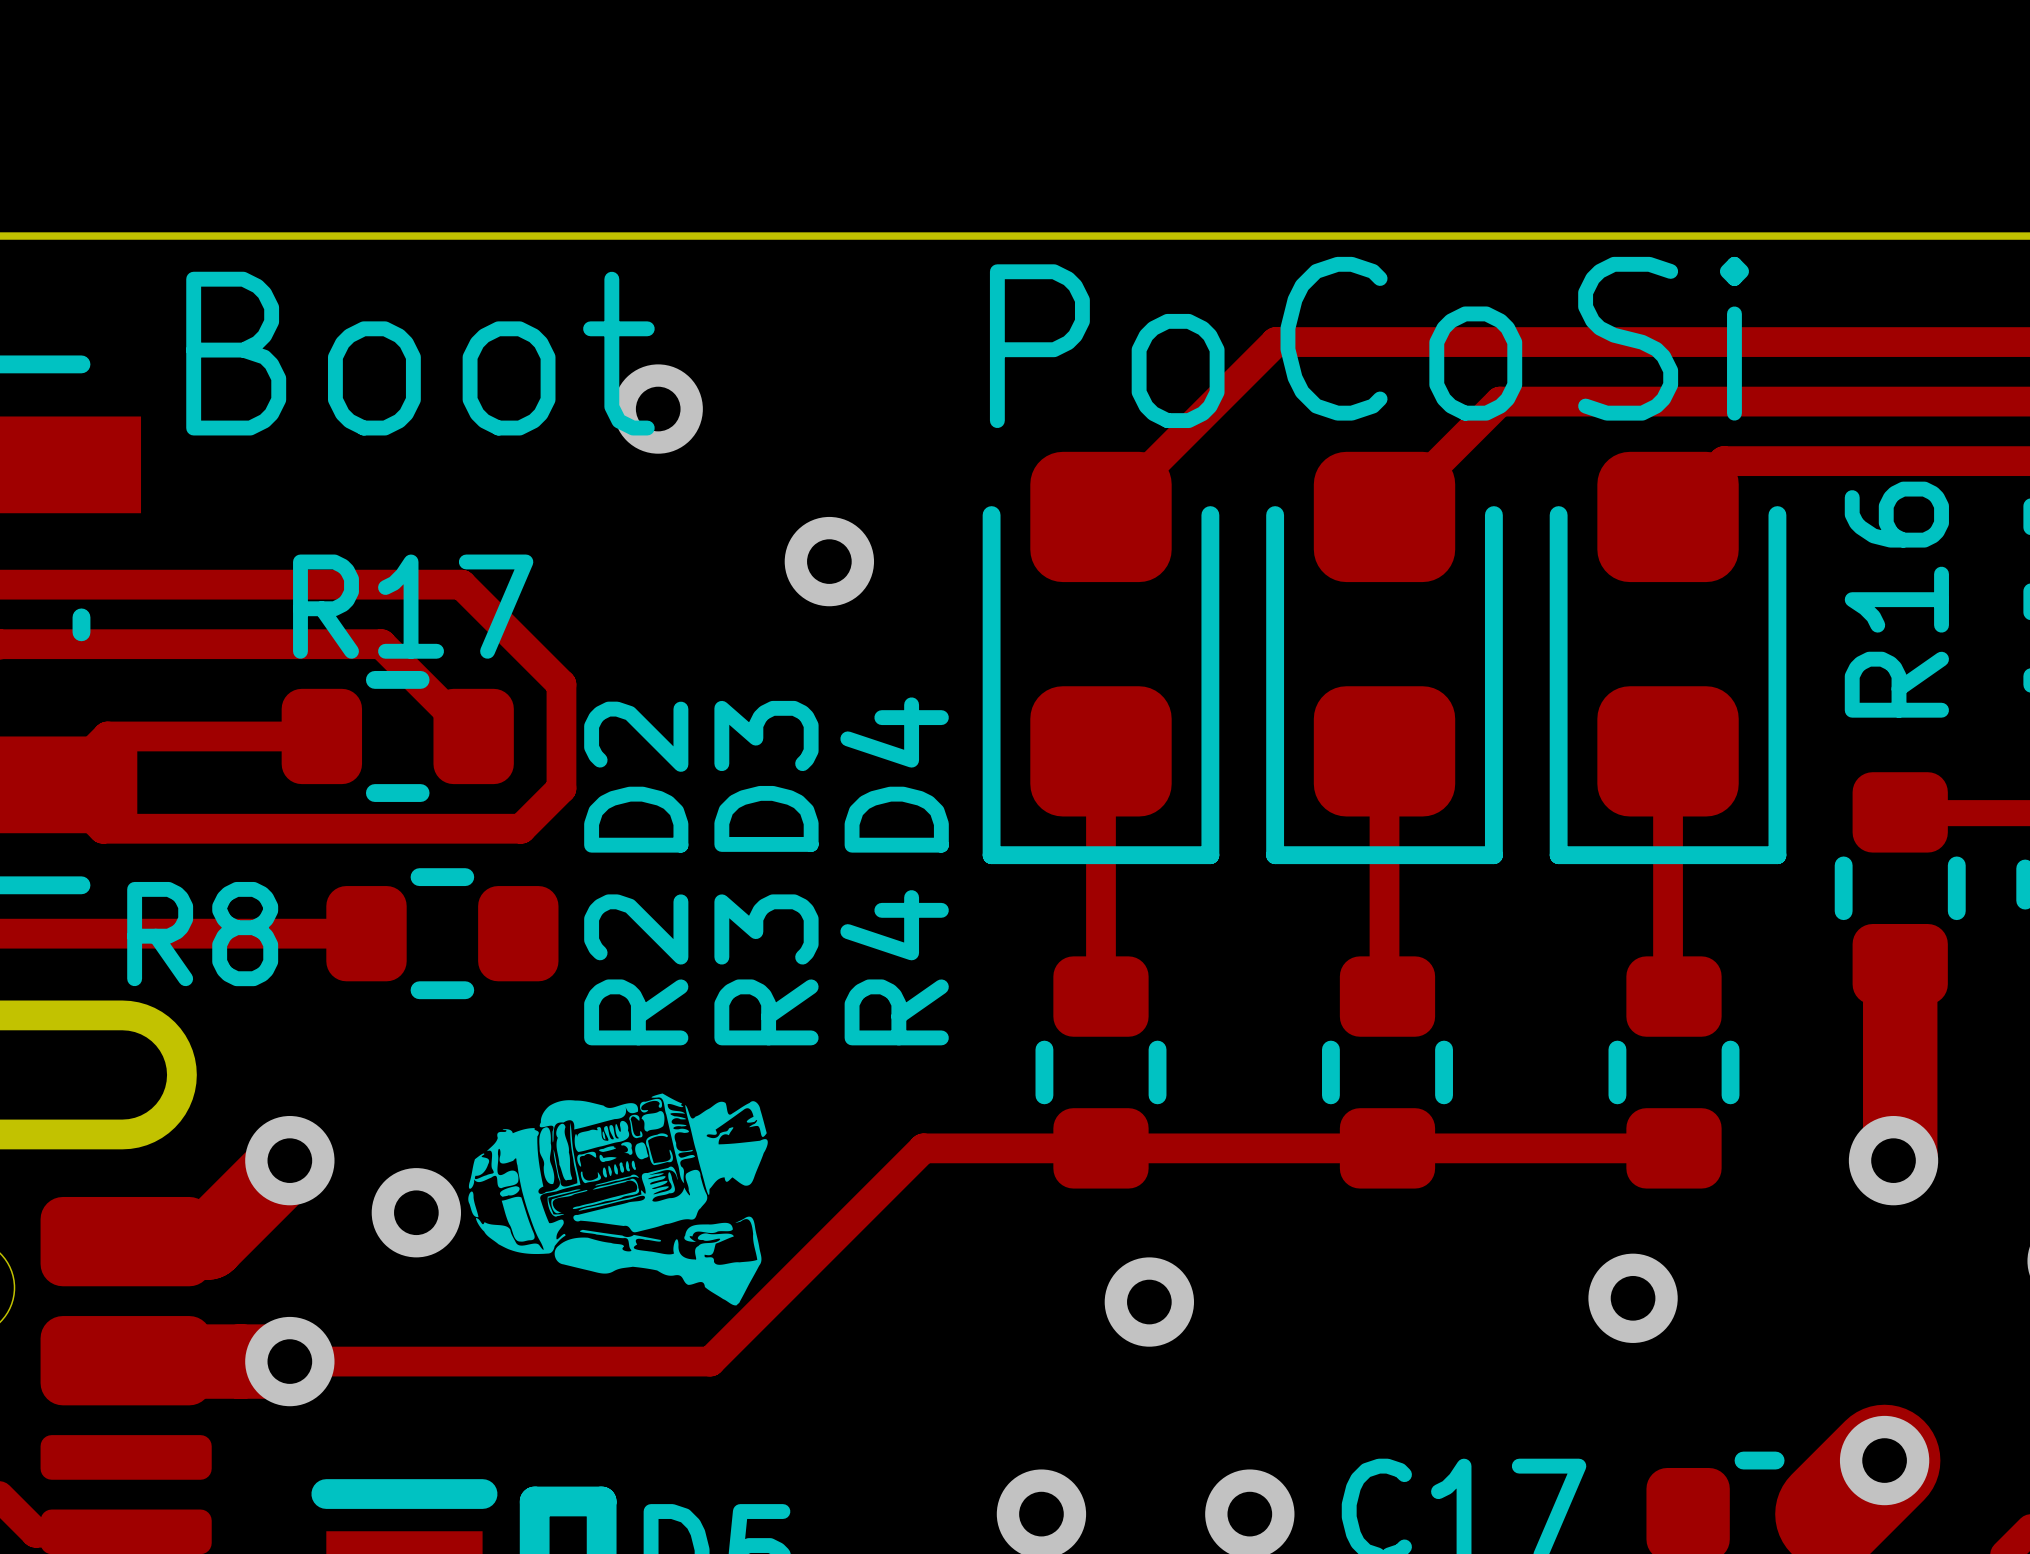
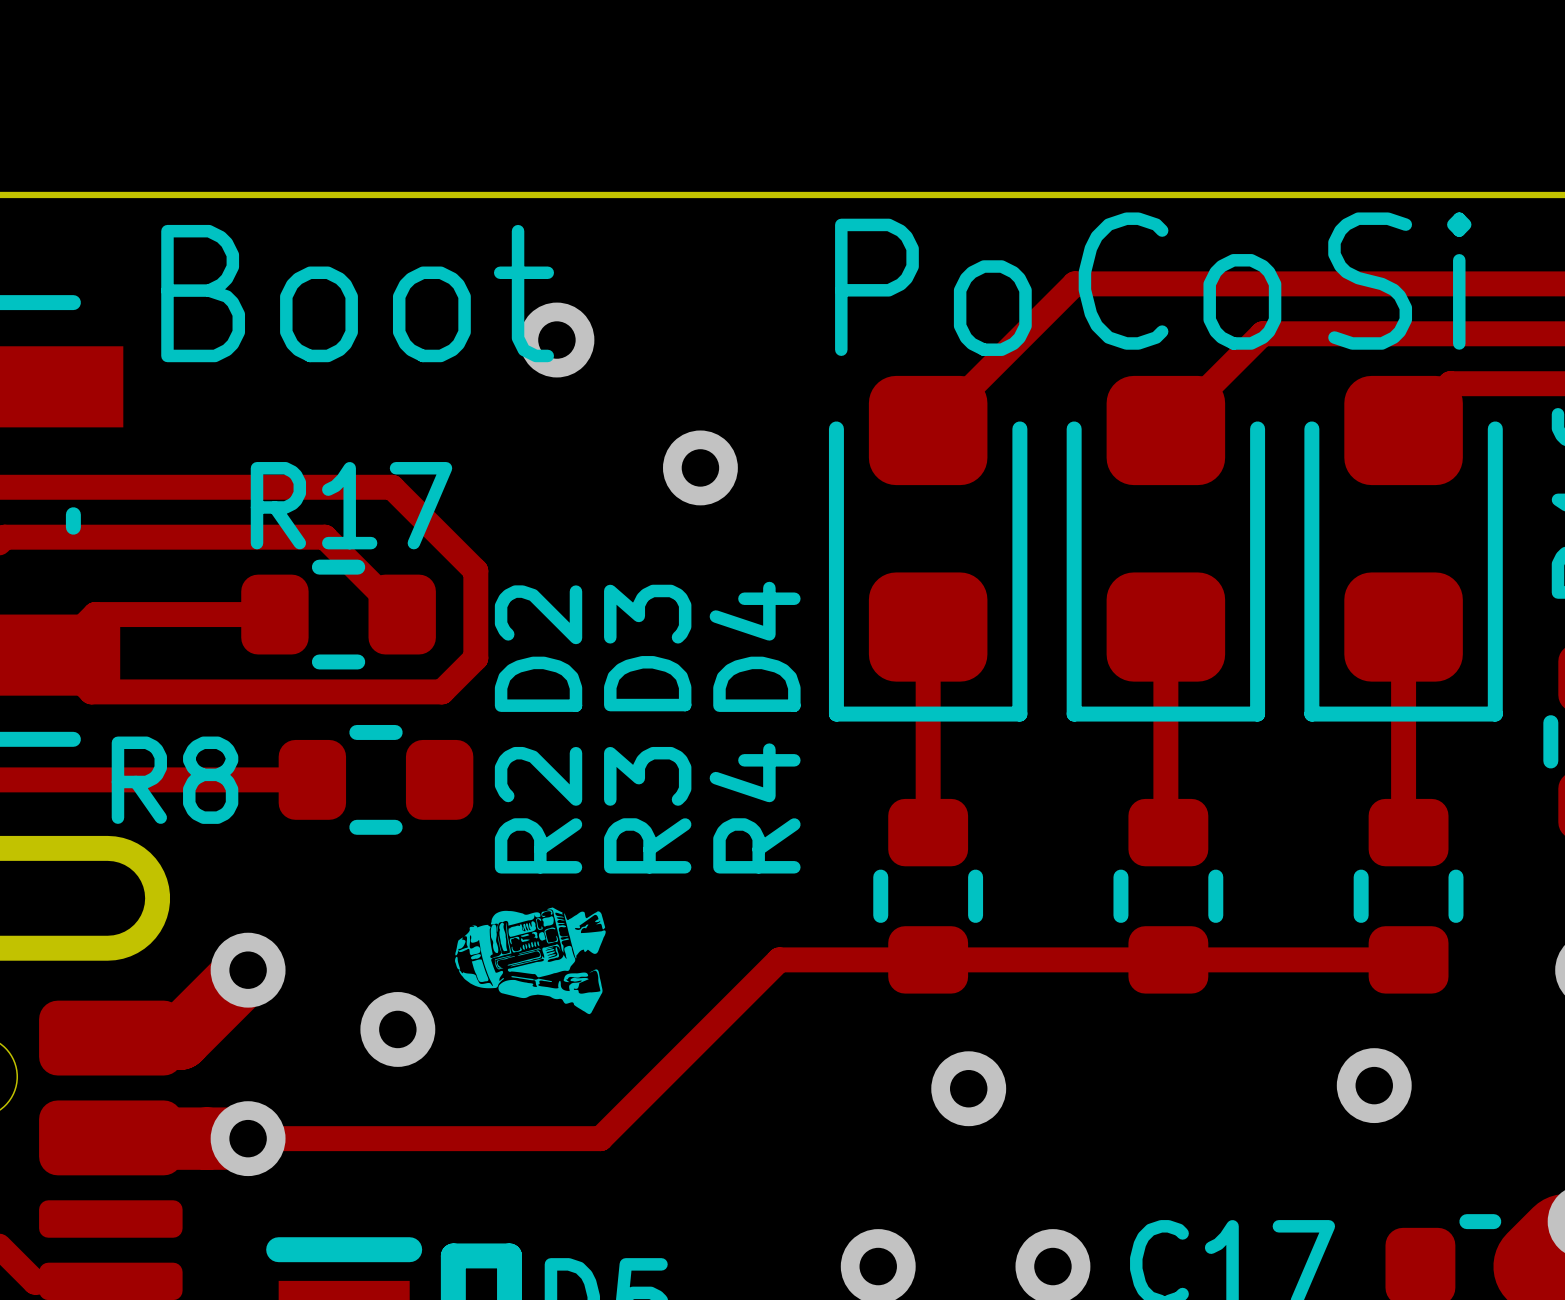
drawing: none -> [455, 907, 606, 1015]
drawing: [468, 1093, 768, 1306] -> none
drawing shape: [641, 1111, 665, 1132] -> [544, 927, 558, 944]
drawing shape: [539, 1127, 555, 1185] -> [455, 956, 461, 970]
drawing shape: [635, 1142, 649, 1160] -> [507, 944, 576, 978]
via position: (416, 1212) -> (397, 1029)

